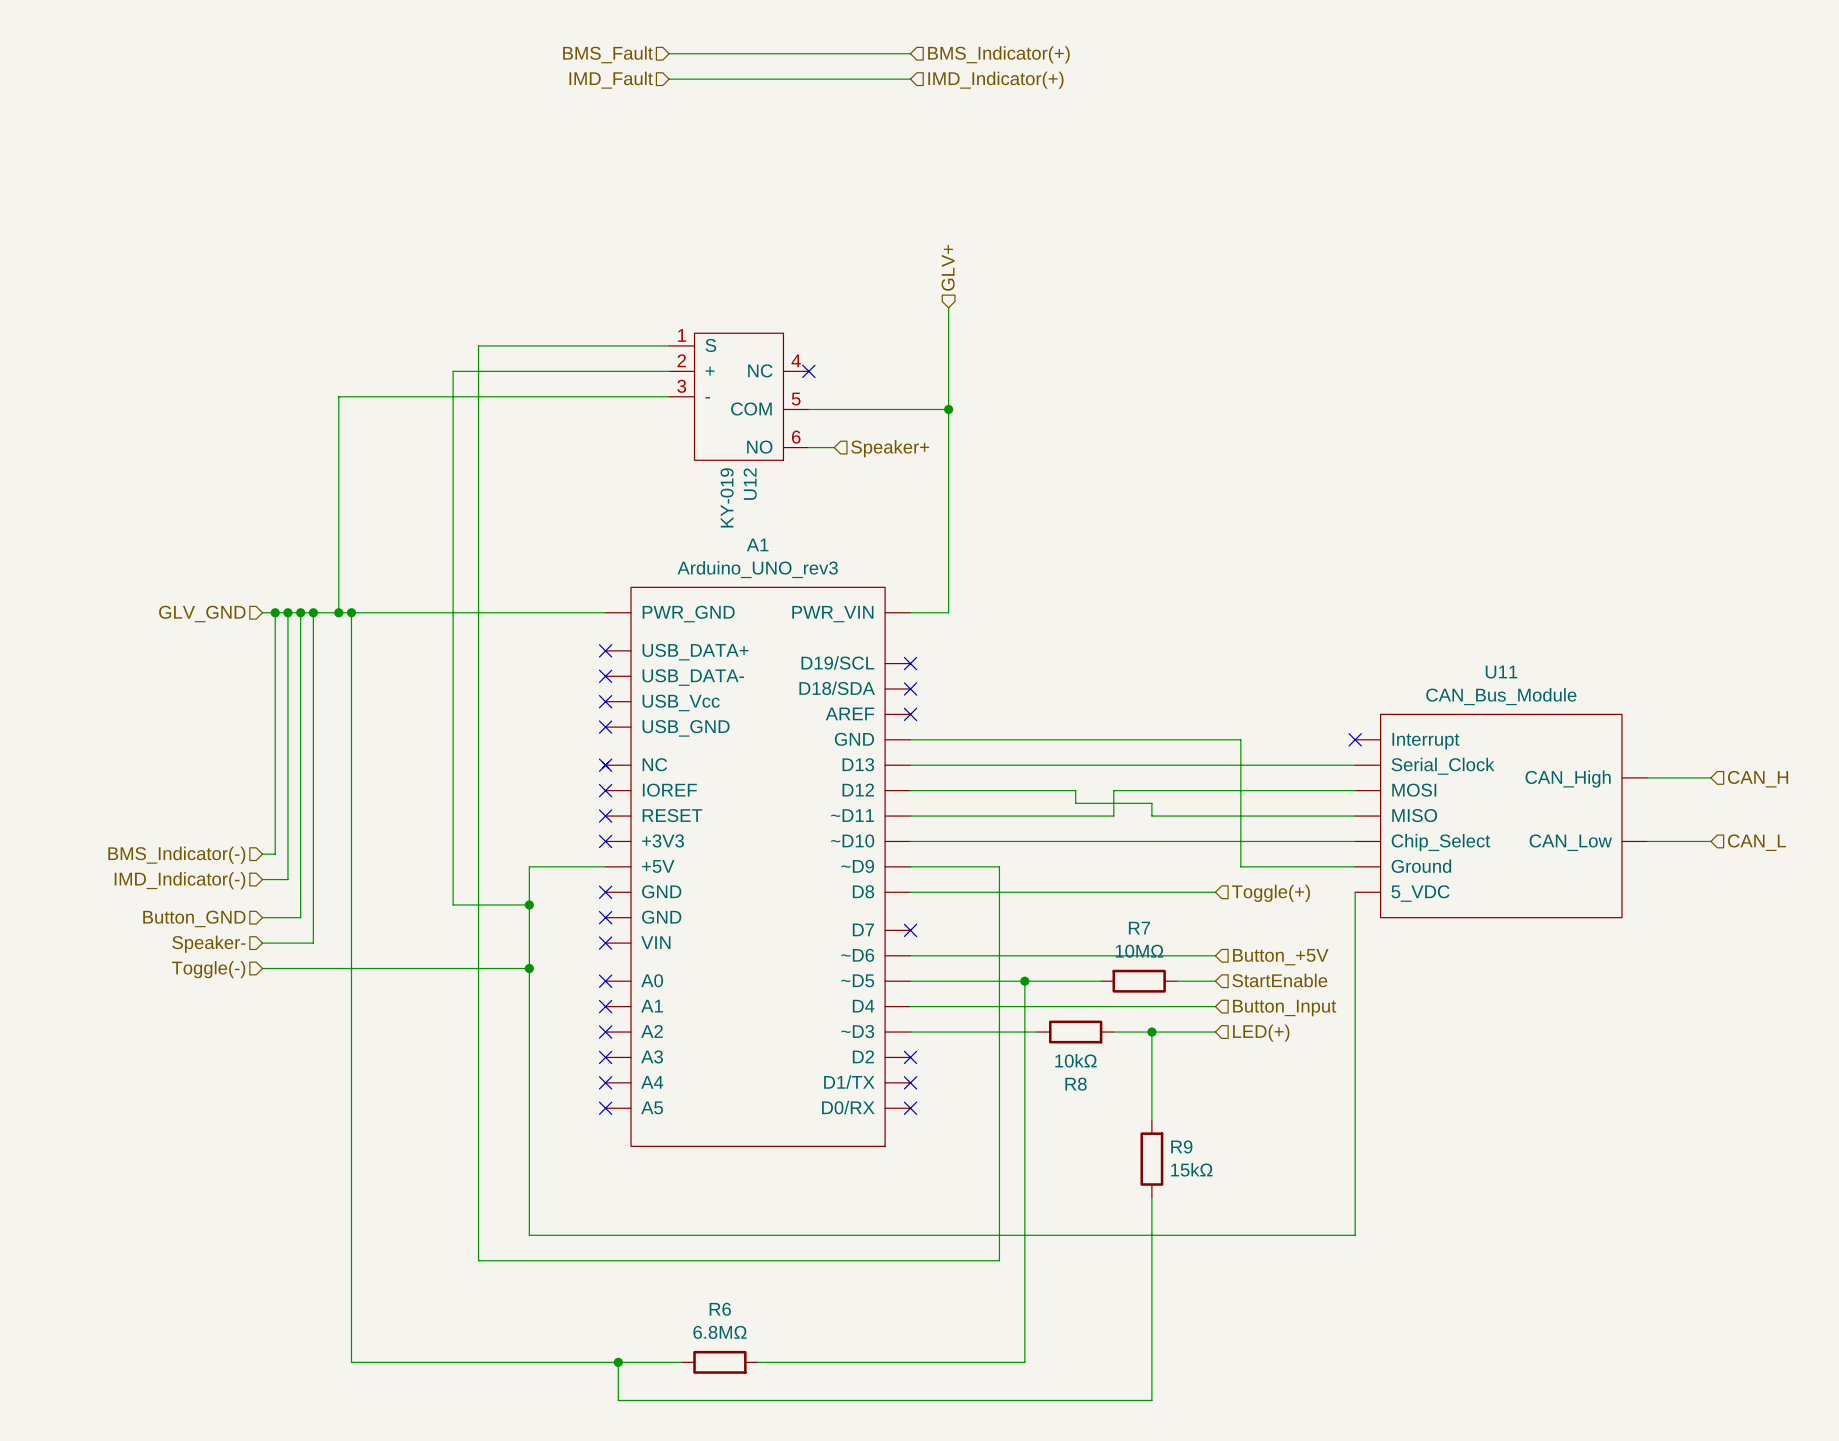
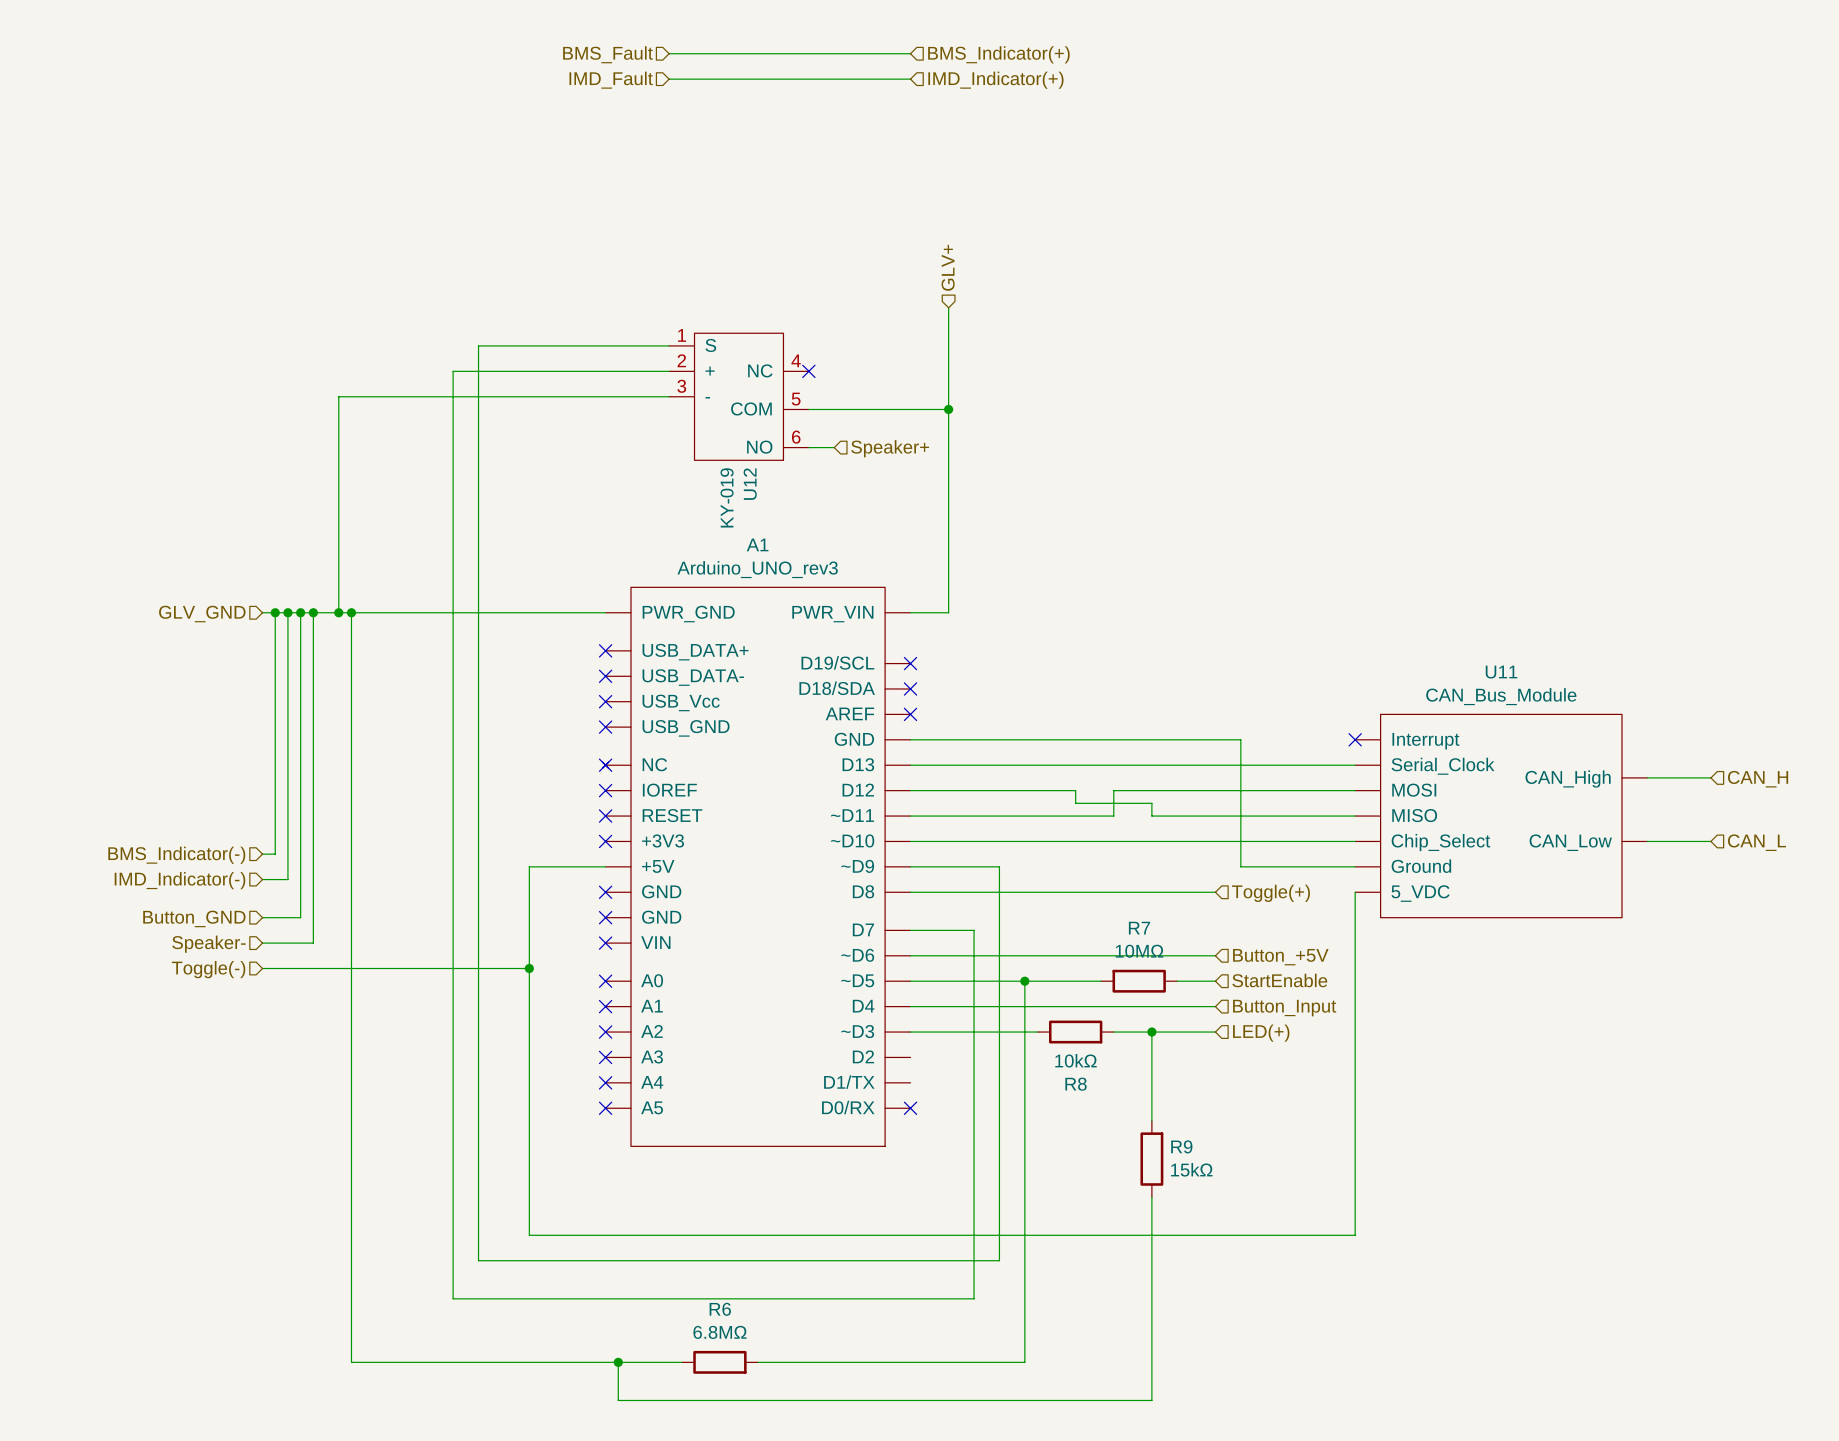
wire: (453, 904) (529, 904) -> (453, 904) (453, 1298) (974, 1298) (974, 930) (910, 930)
junction: (529, 904) -> none
no-connect mark: (910, 930) -> none
no-connect mark: (910, 1057) -> none
no-connect mark: (910, 1082) -> none

